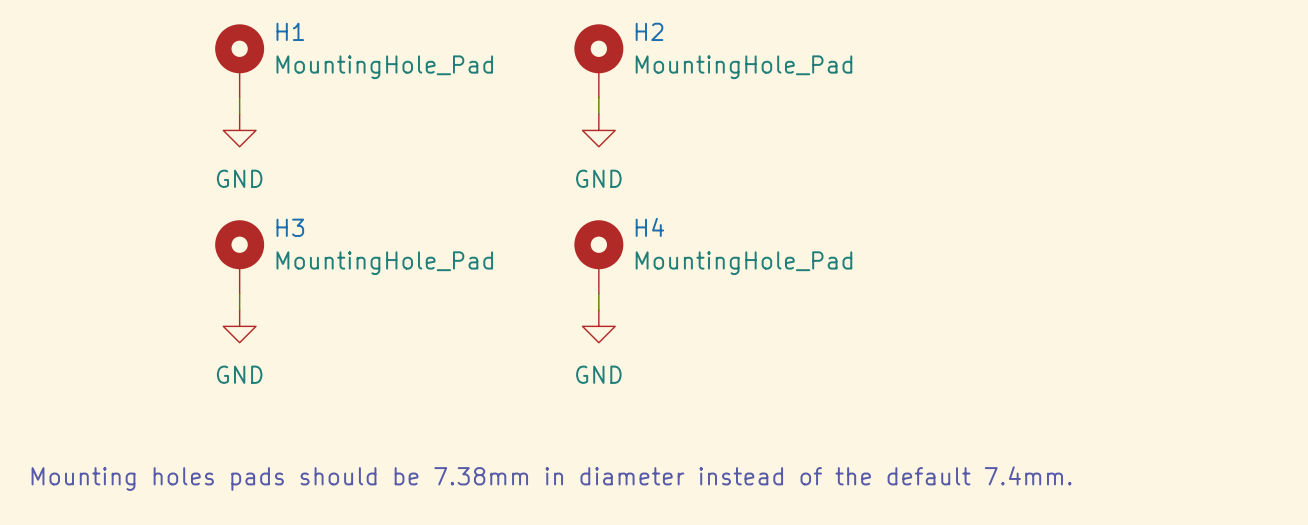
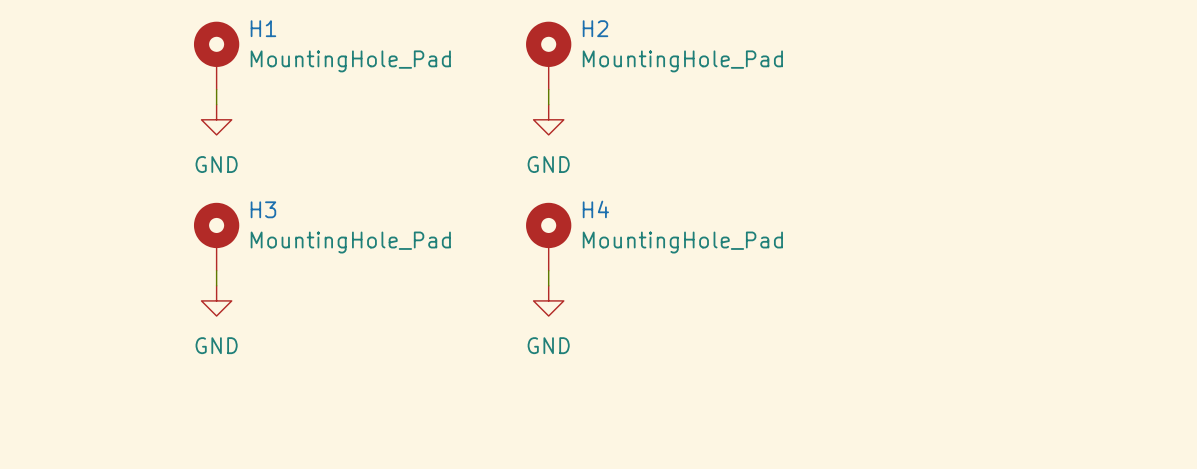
text: Mounting holes pads should be 7.38mm in diameter instead of the default 7.4mm. (551, 478) -> none

